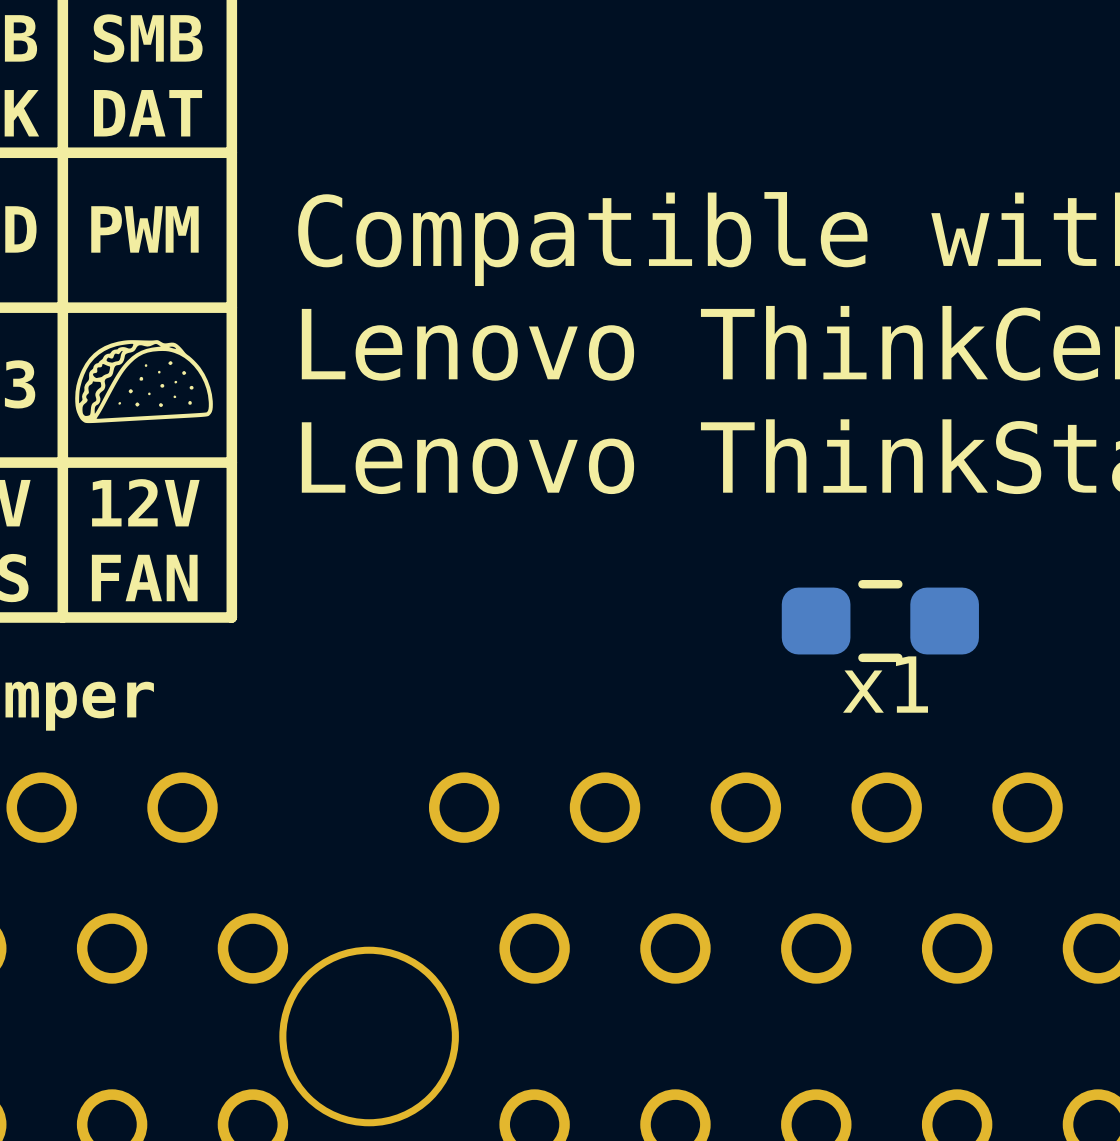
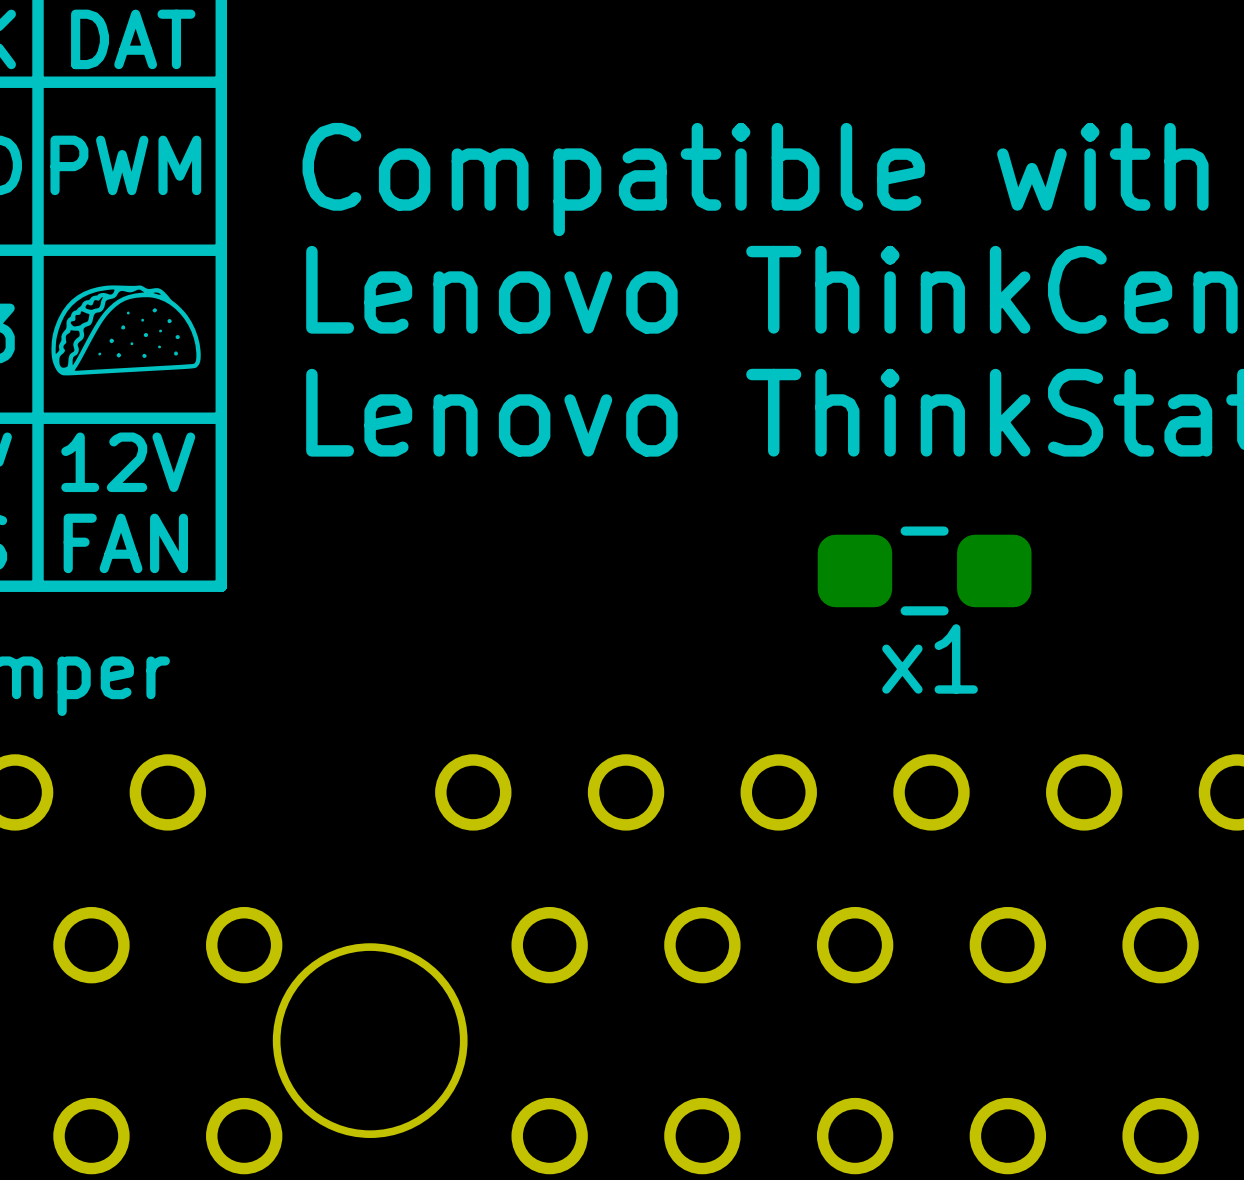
part position: (880, 621) -> (924, 570)

